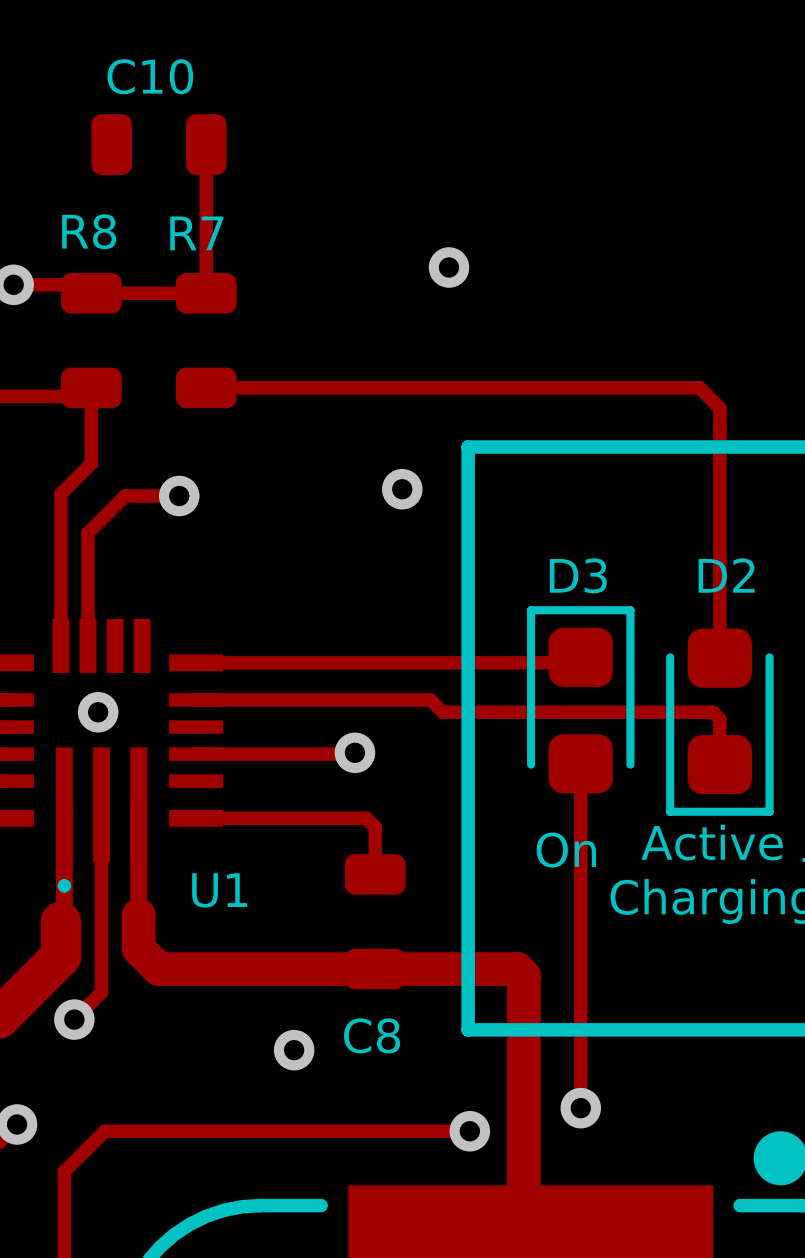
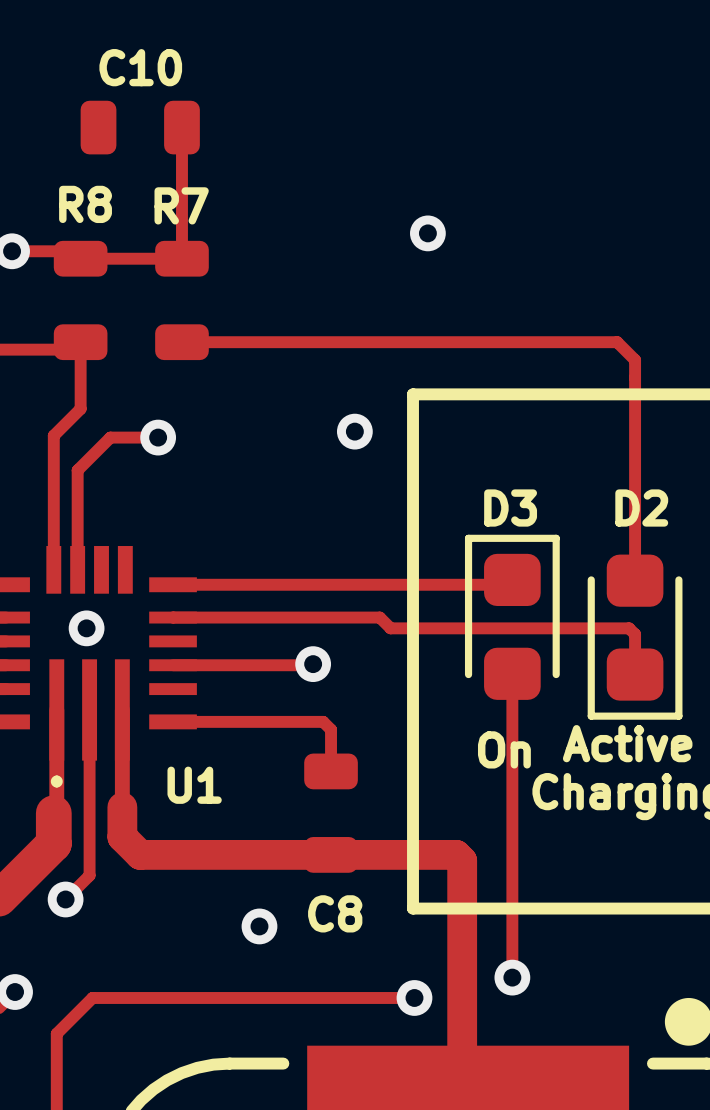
via position: (449, 267) -> (427, 233)

